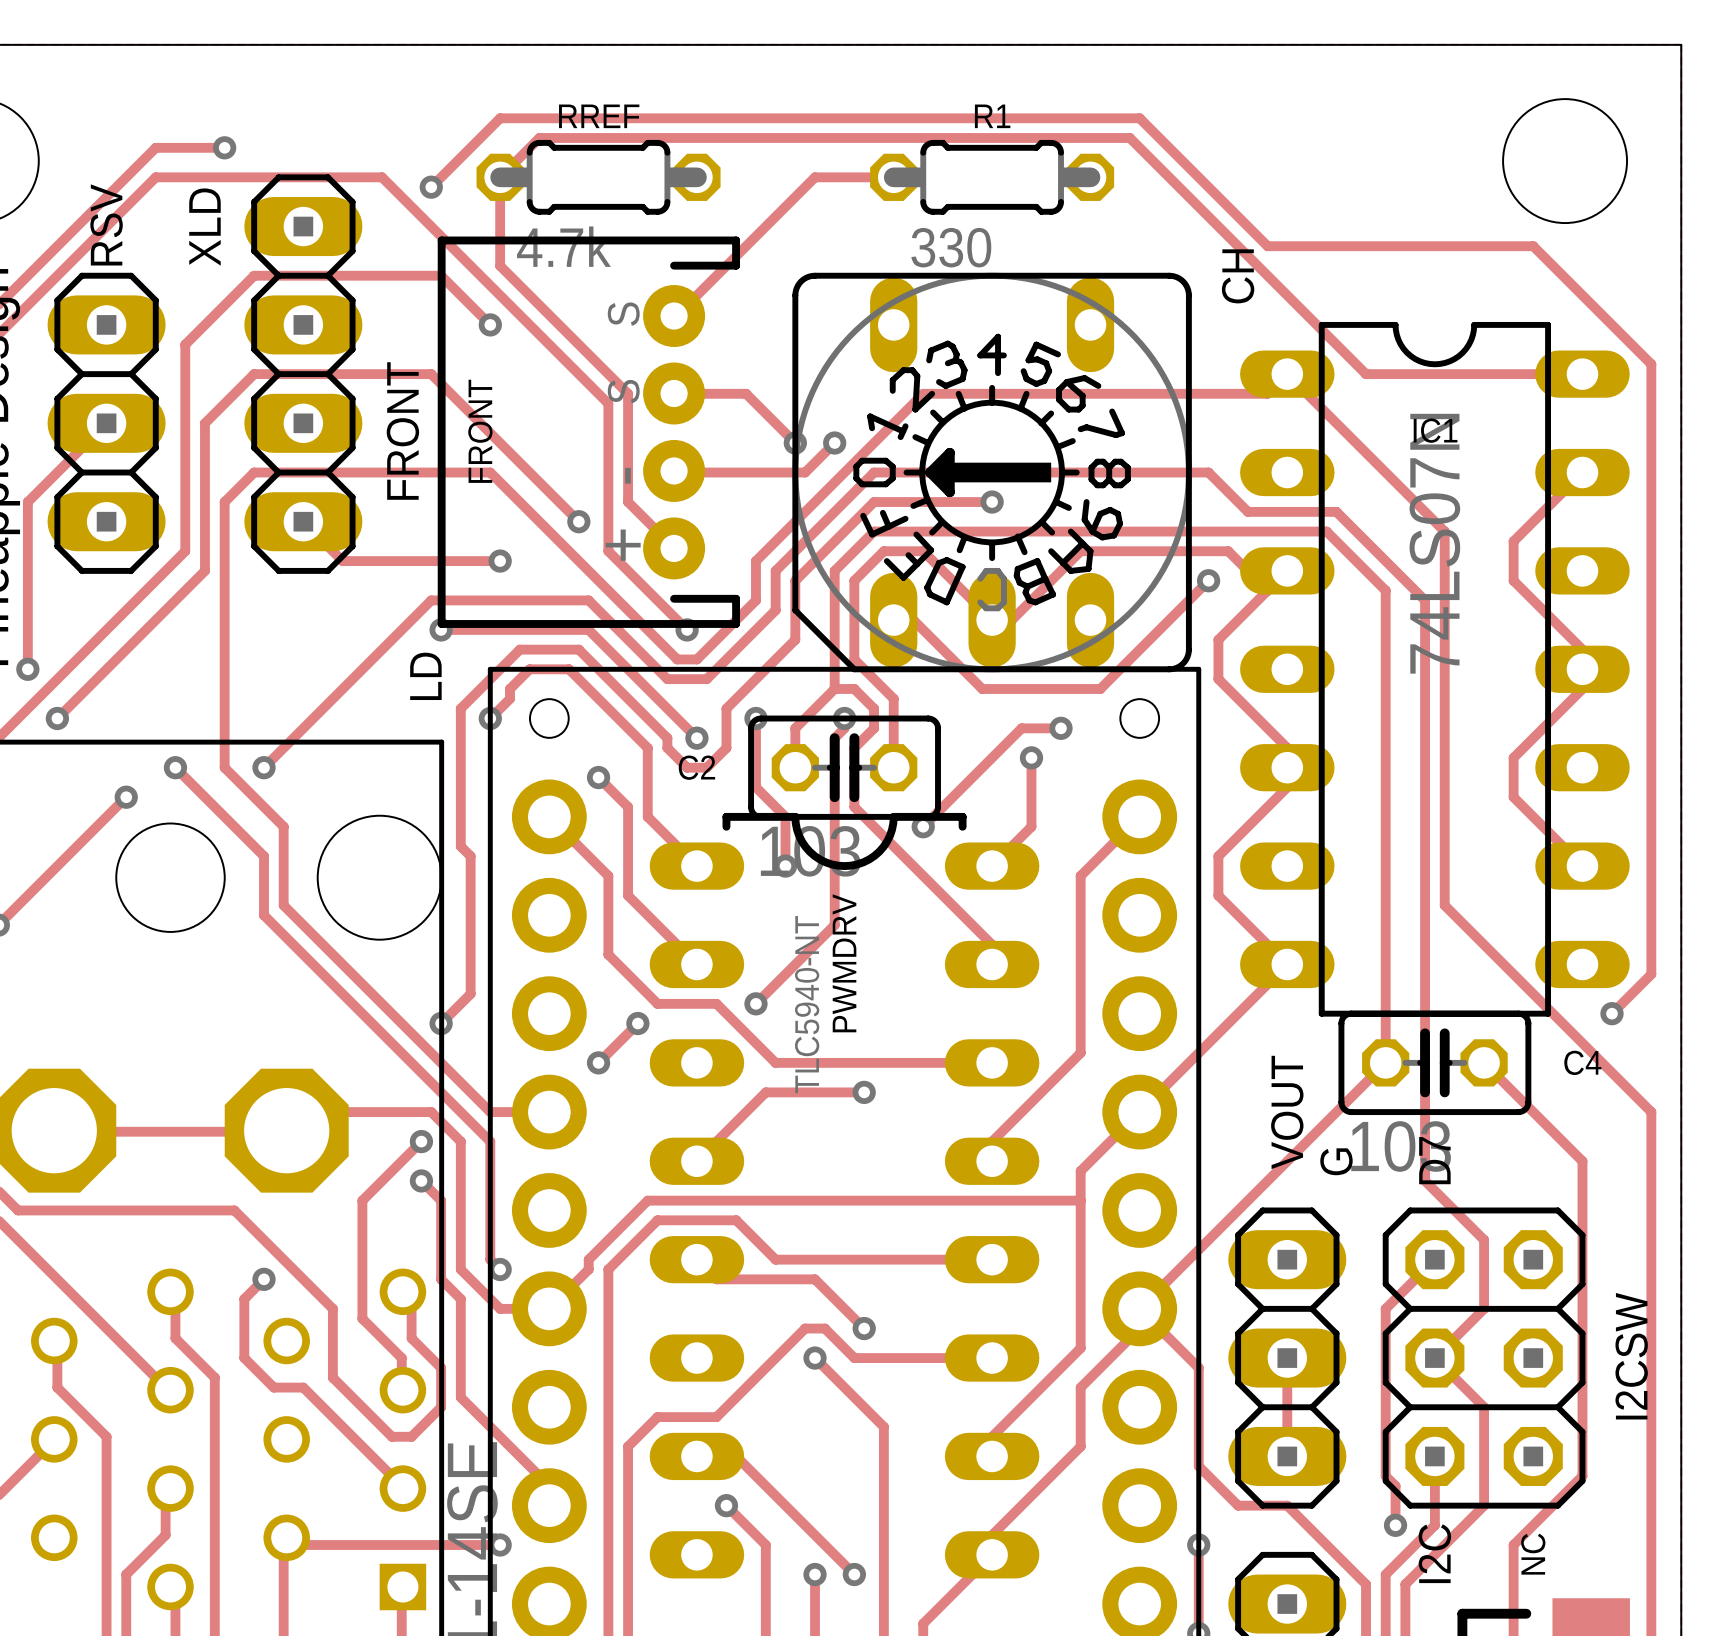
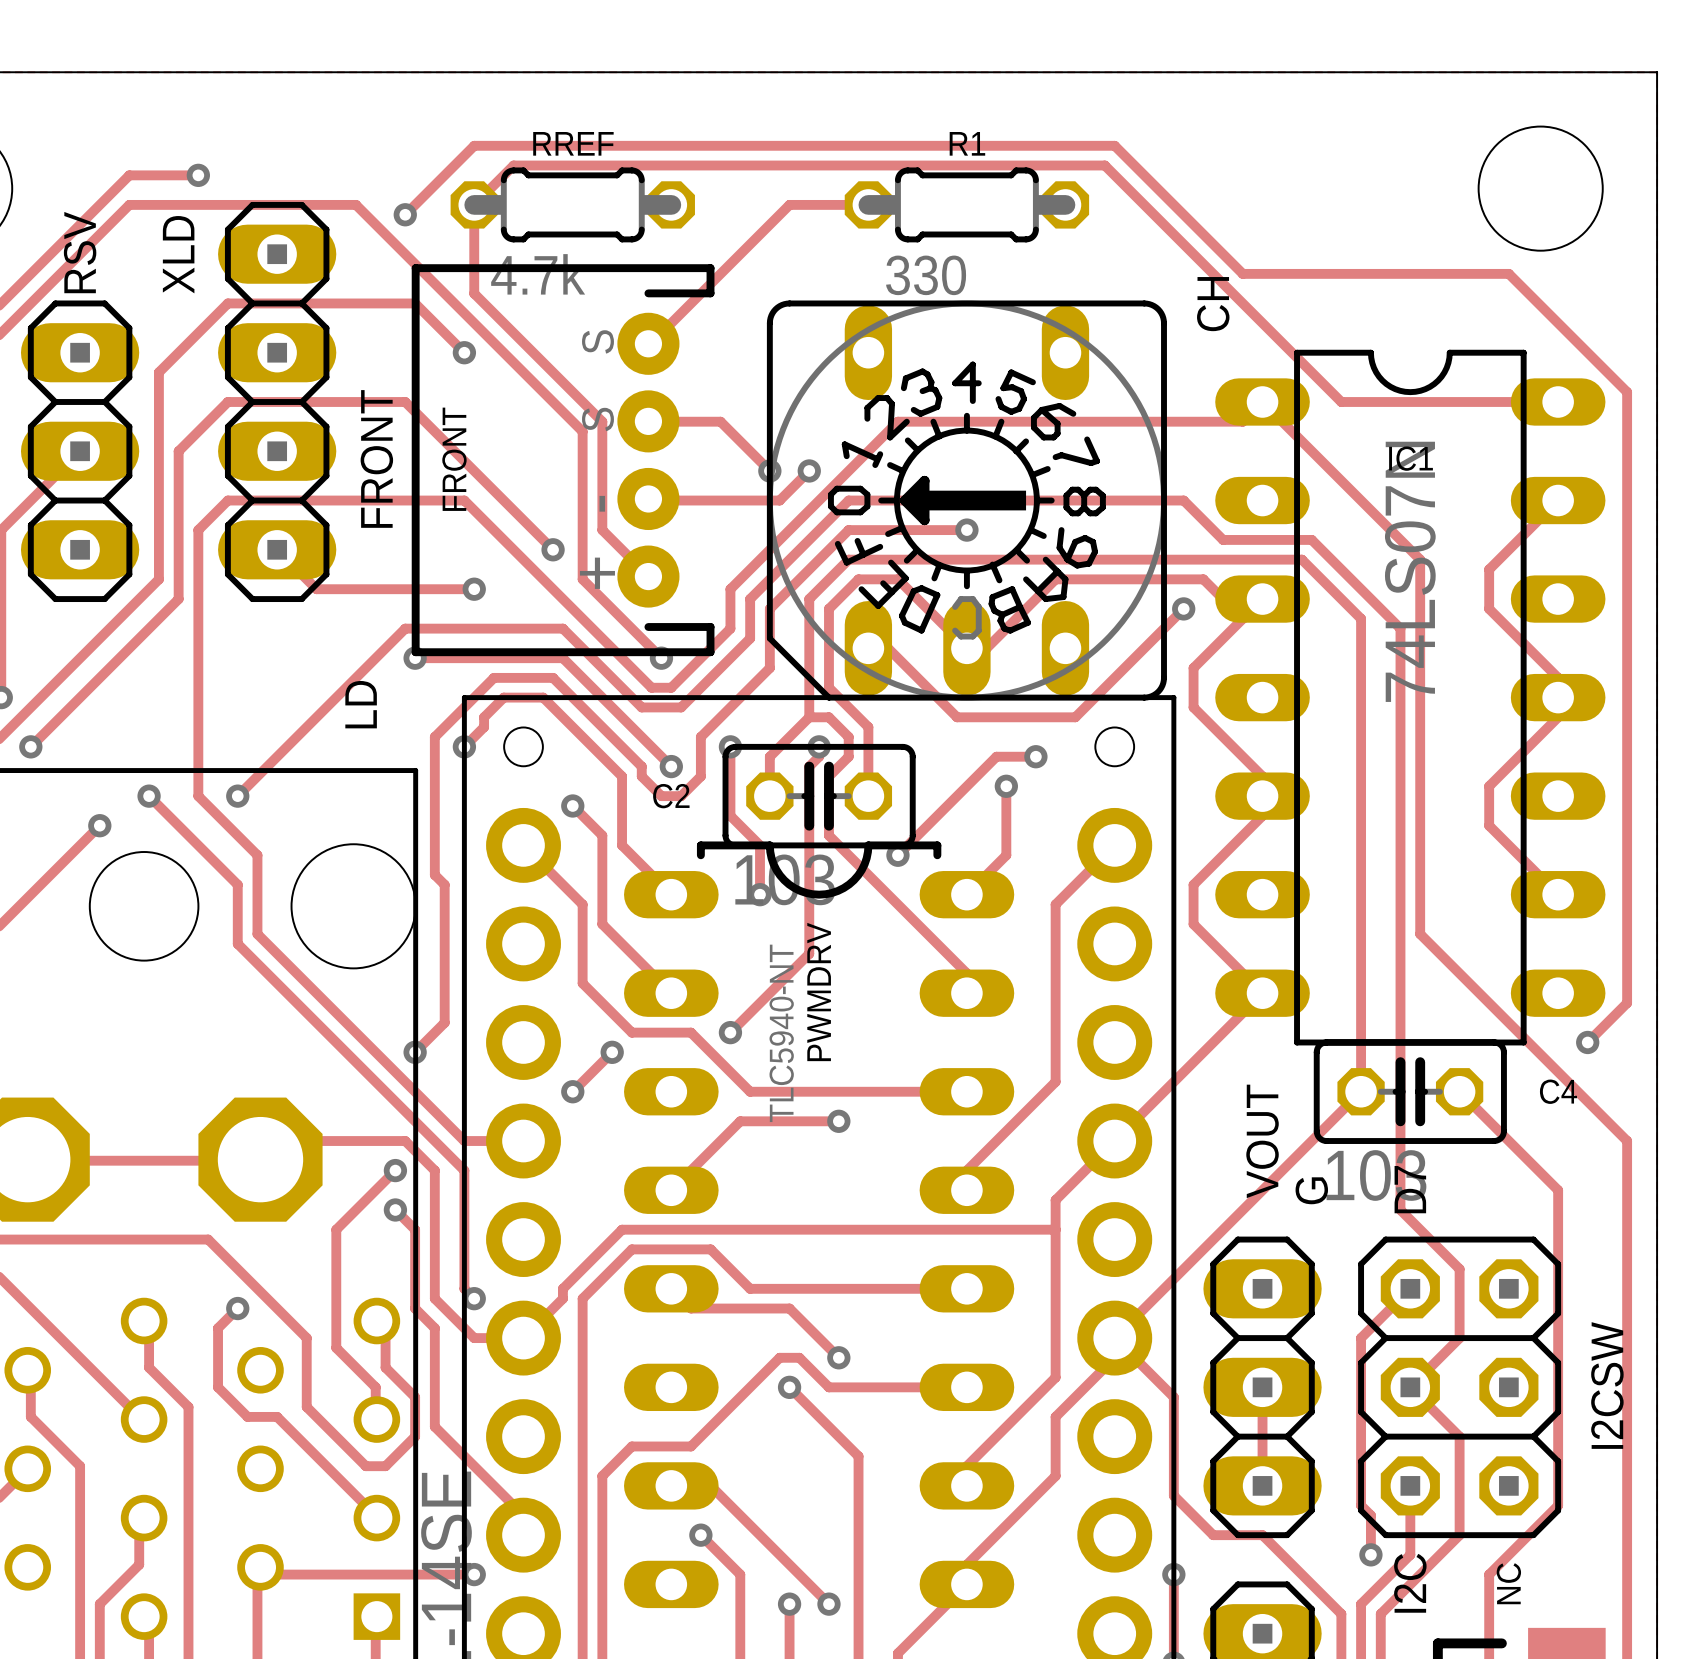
LD name position: LD (425, 676) -> LD (361, 704)

